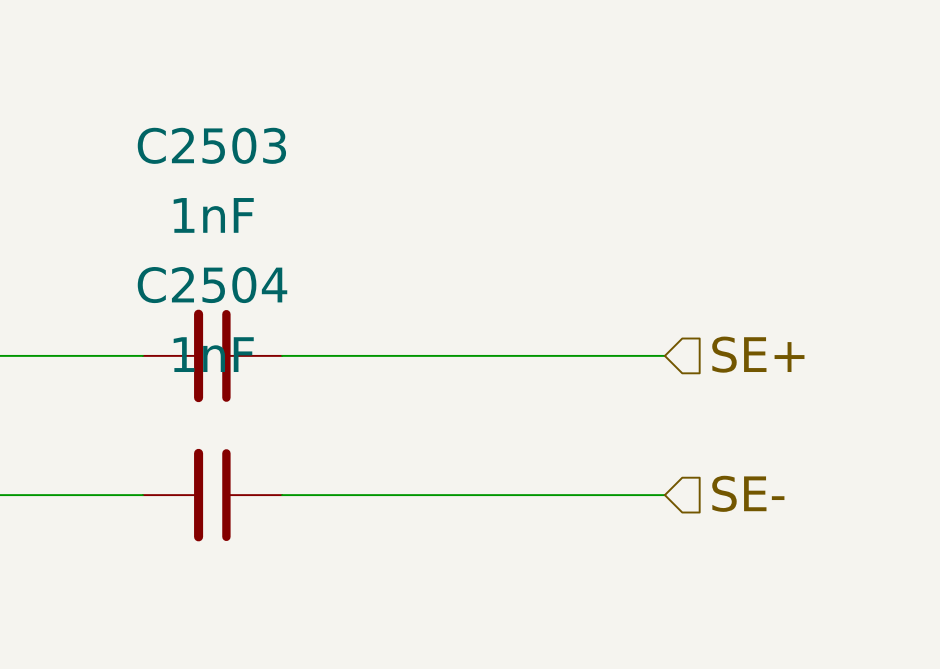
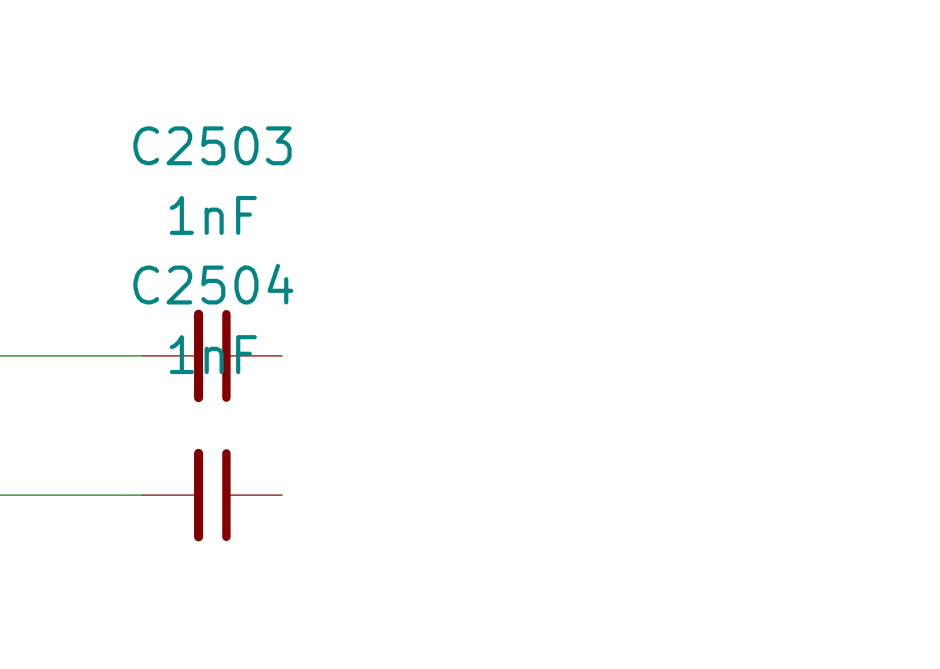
hierarchical label: SE+ (758, 354) -> none
wire: (282, 355) (664, 355) -> none
hierarchical label: SE- (748, 493) -> none
wire: (282, 495) (664, 495) -> none

